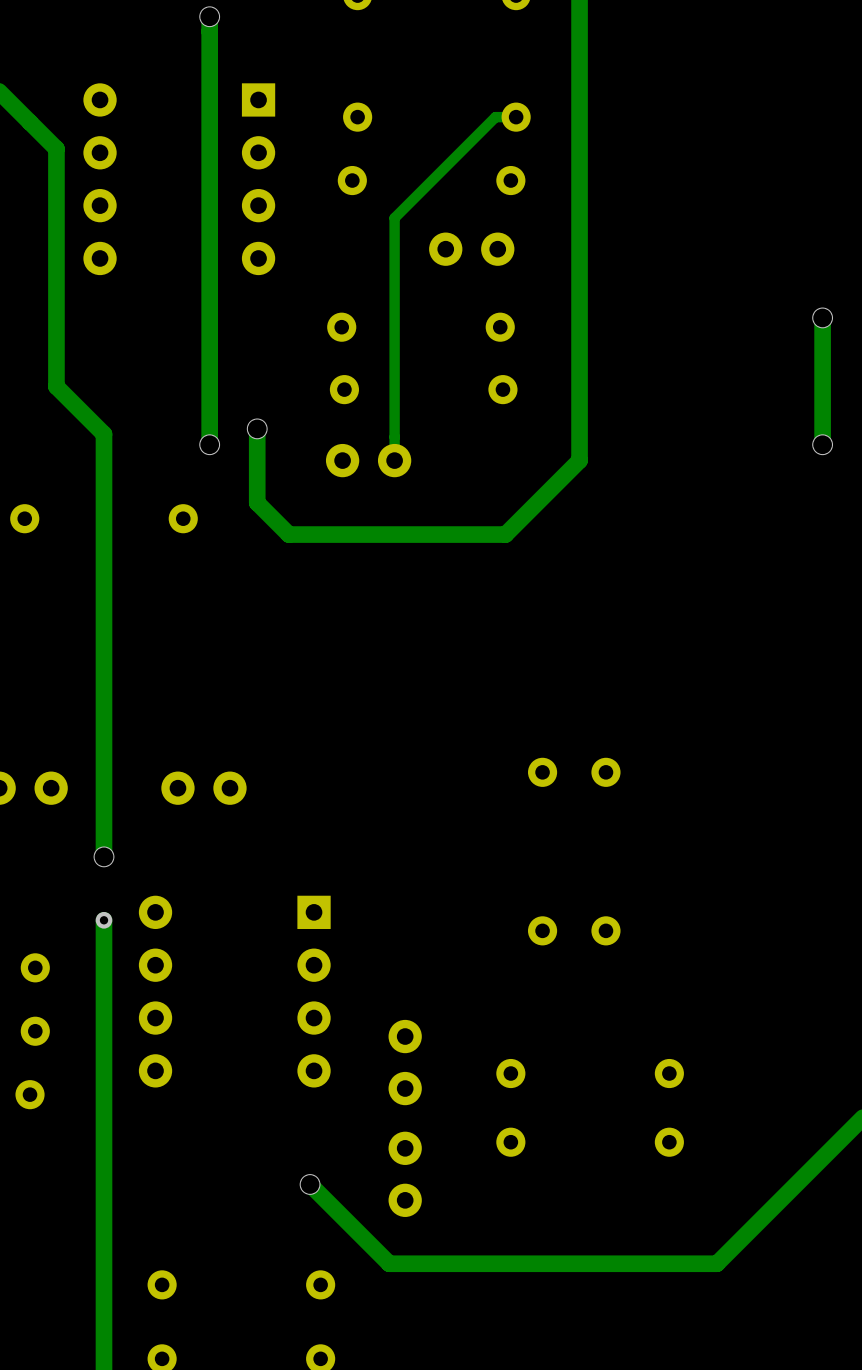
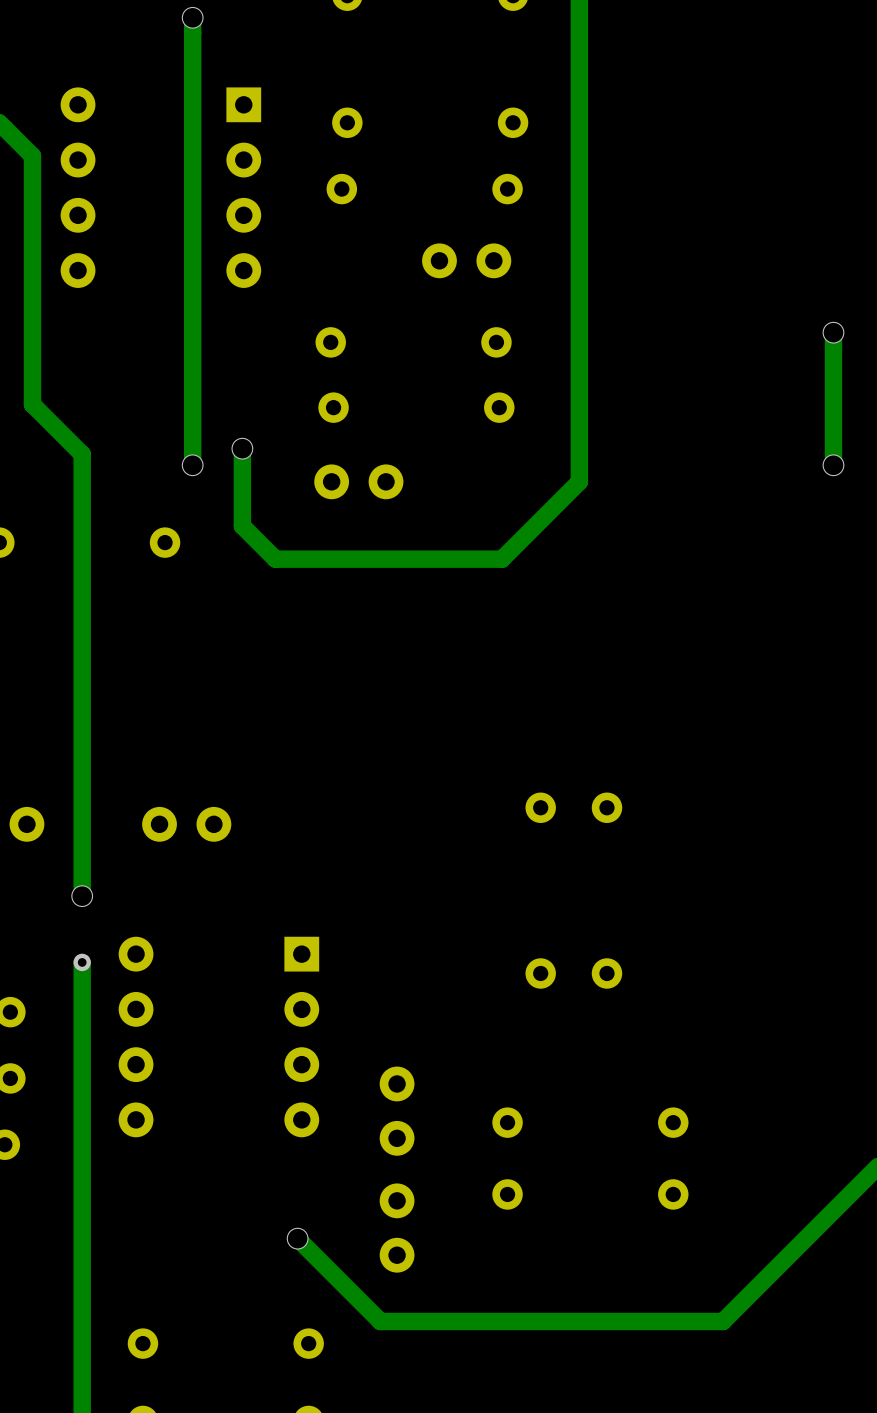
track: (516, 117) (495, 117) (394, 218) (394, 460) -> none

